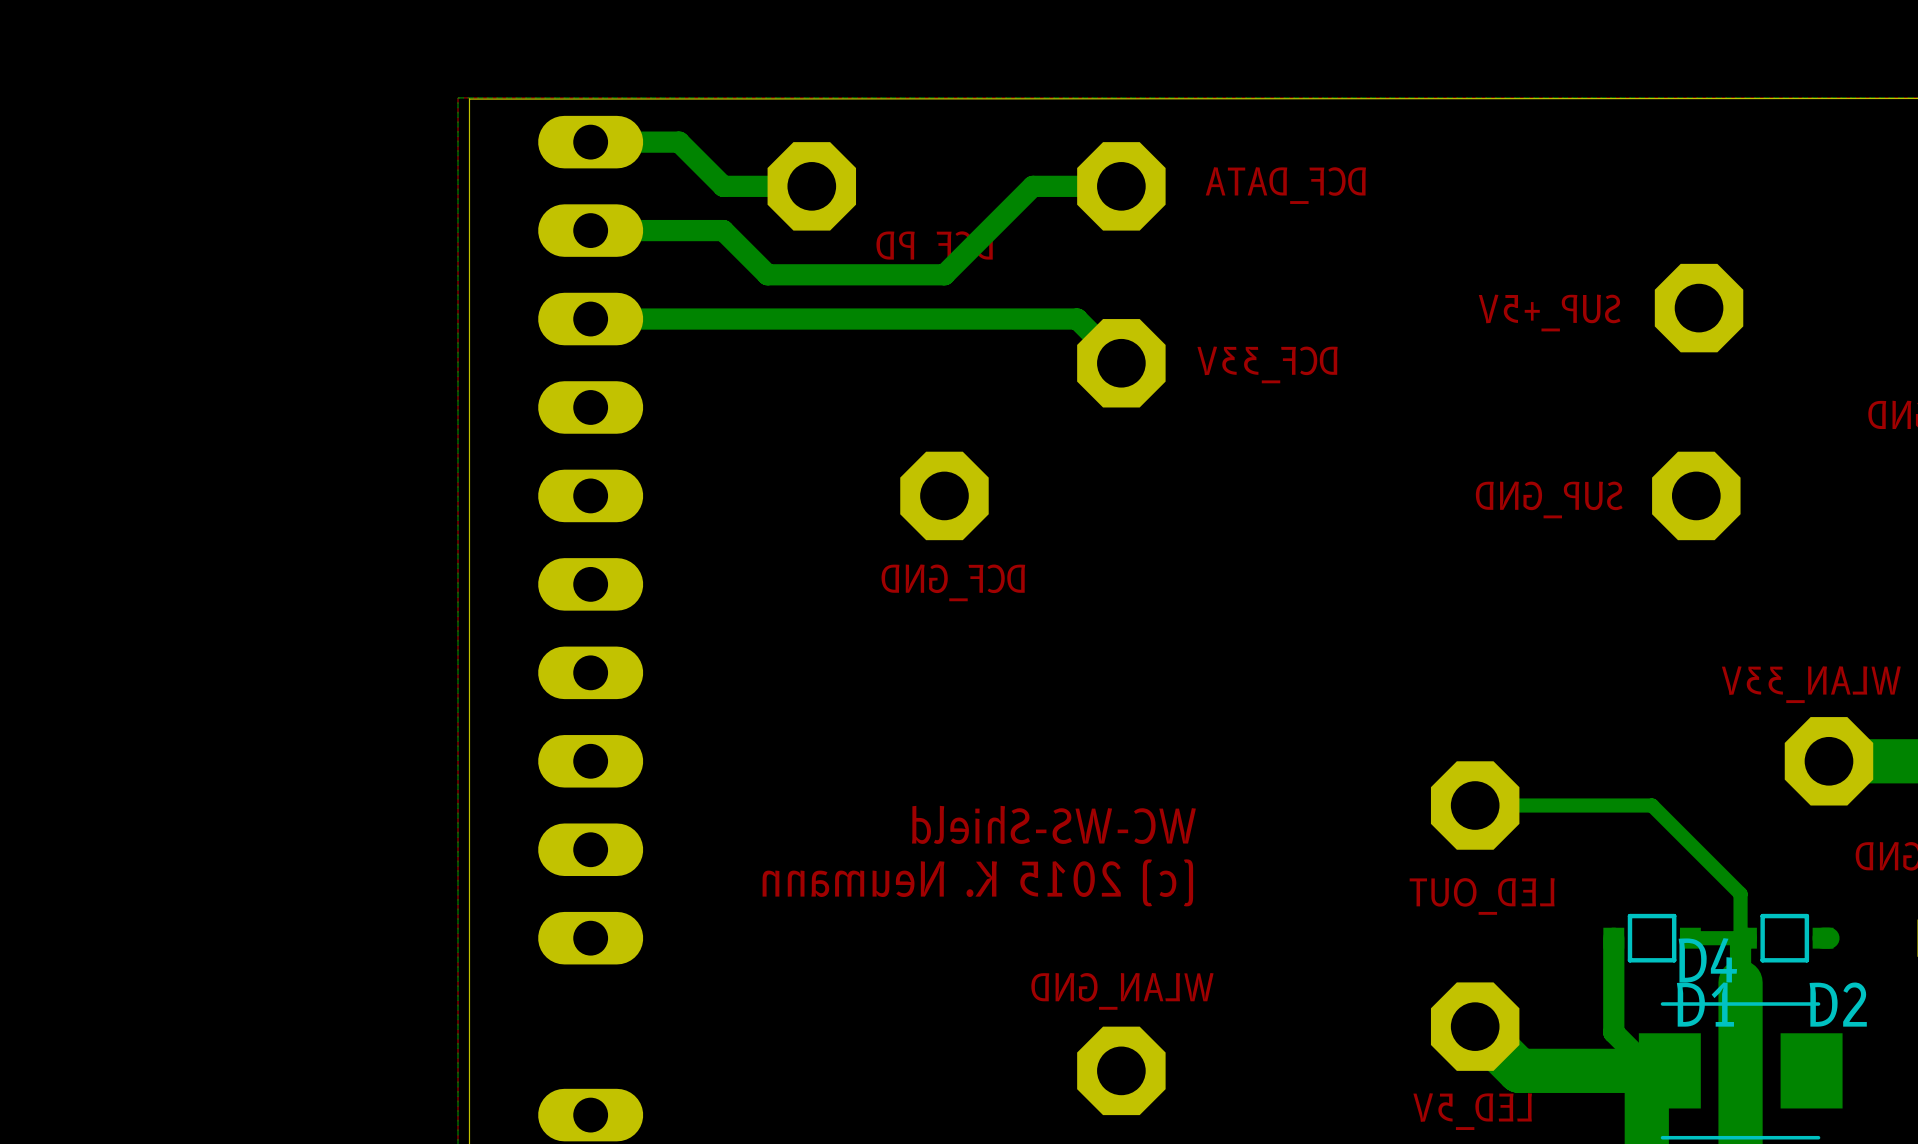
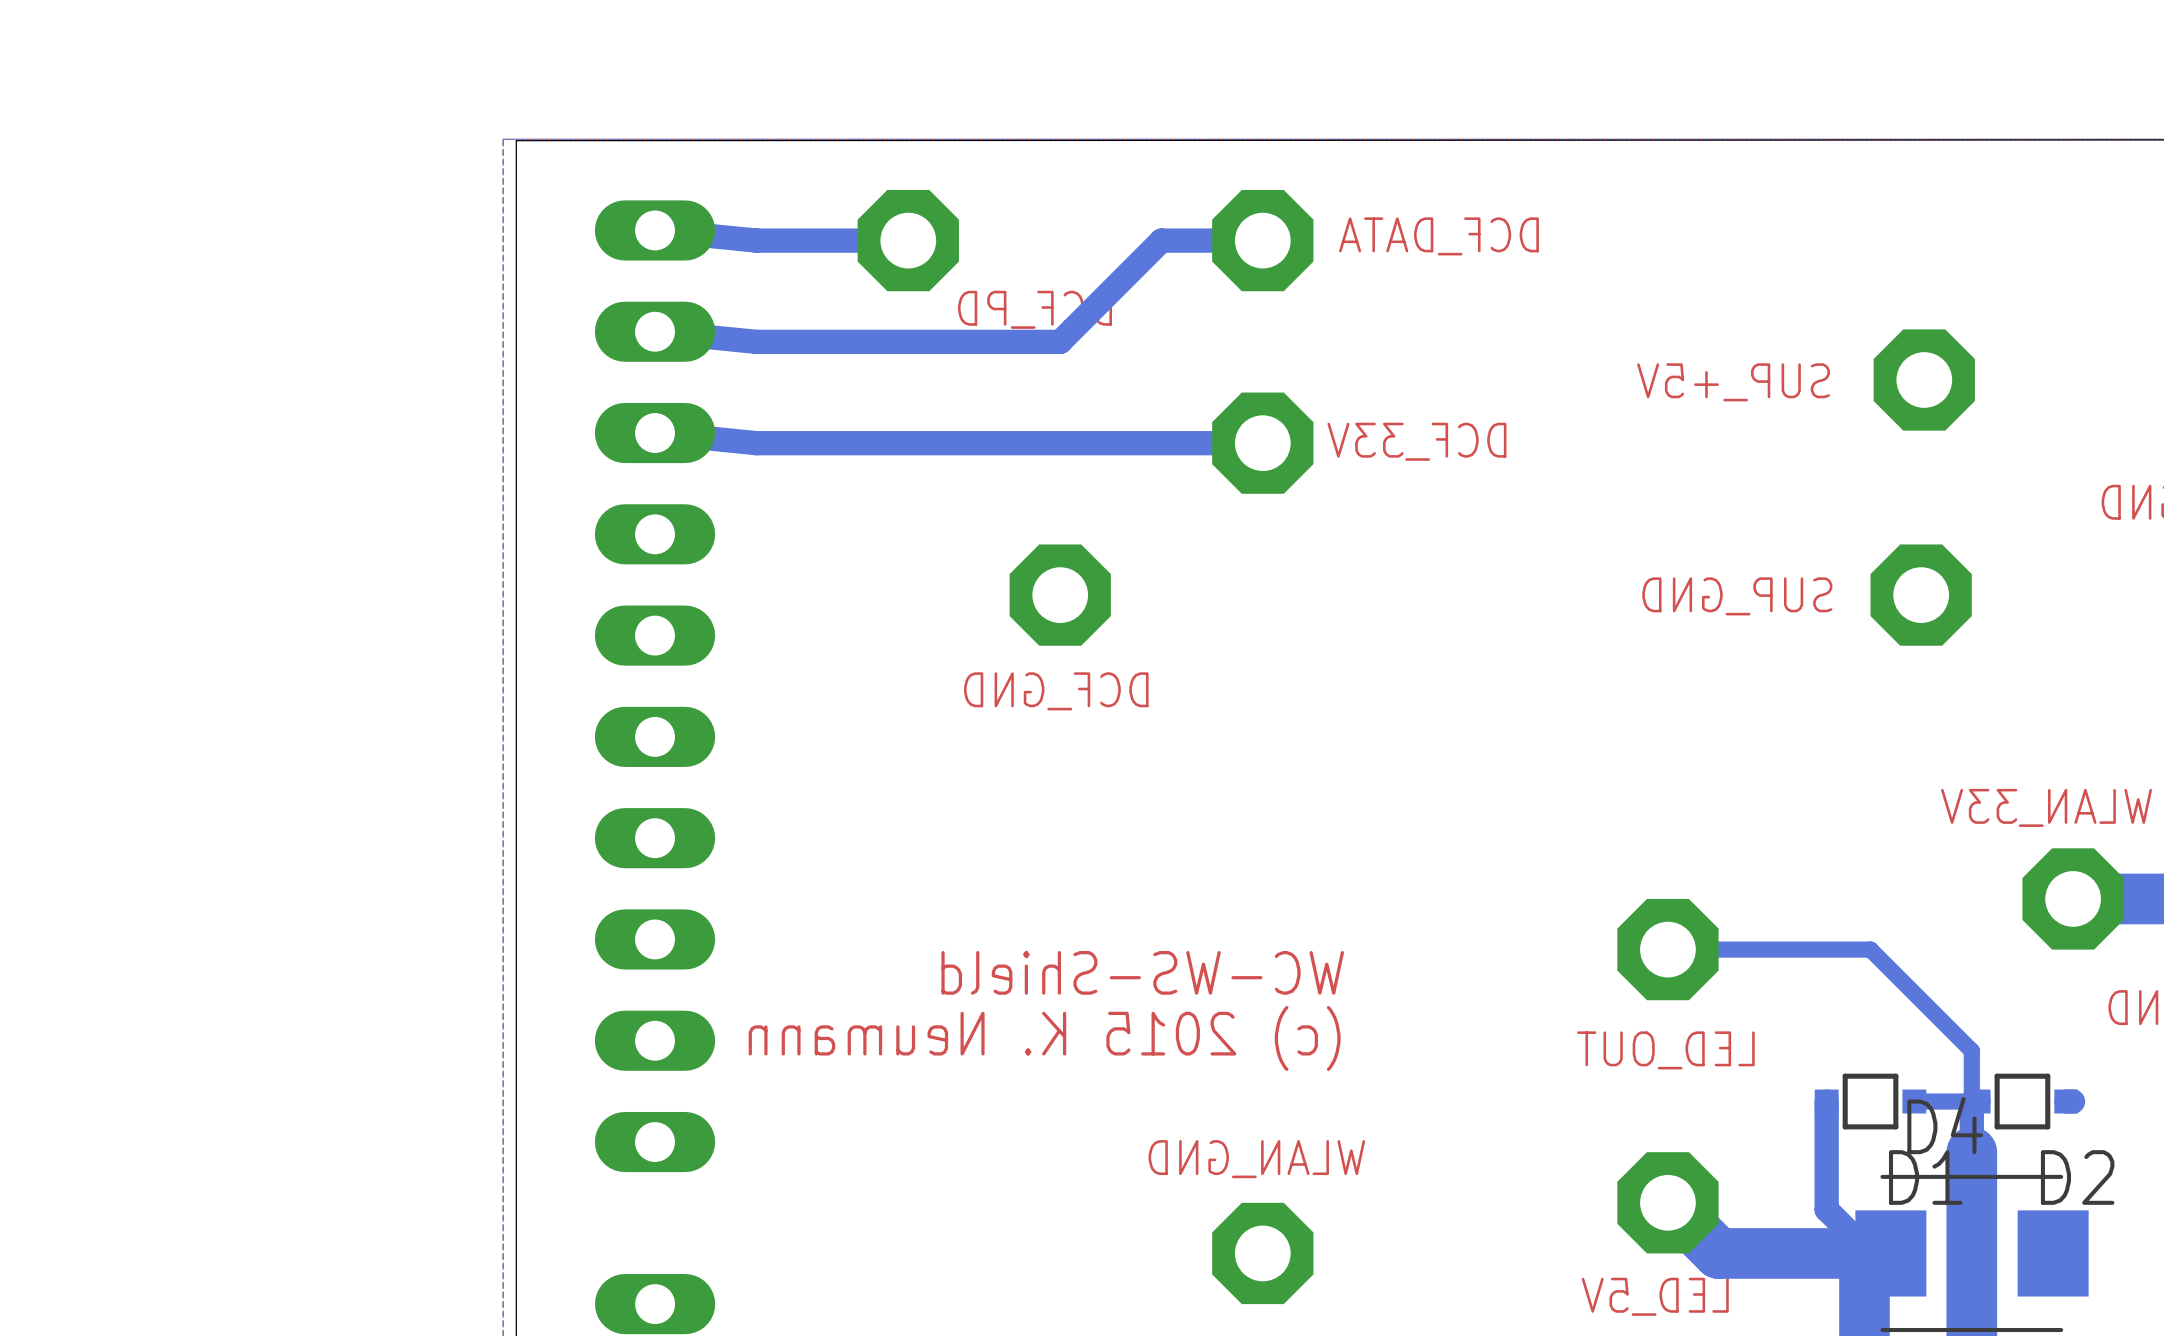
bottom track: (590, 142) (679, 142) (723, 186) -> (655, 230) (756, 240) (807, 240)
bottom track: (590, 230) (723, 230) (767, 274) -> (655, 331) (756, 341) (857, 341)
bottom track: (590, 319) (1077, 319) (1121, 363) -> (655, 433) (756, 443) (1262, 443)
part position: (590, 540) -> (655, 686)

